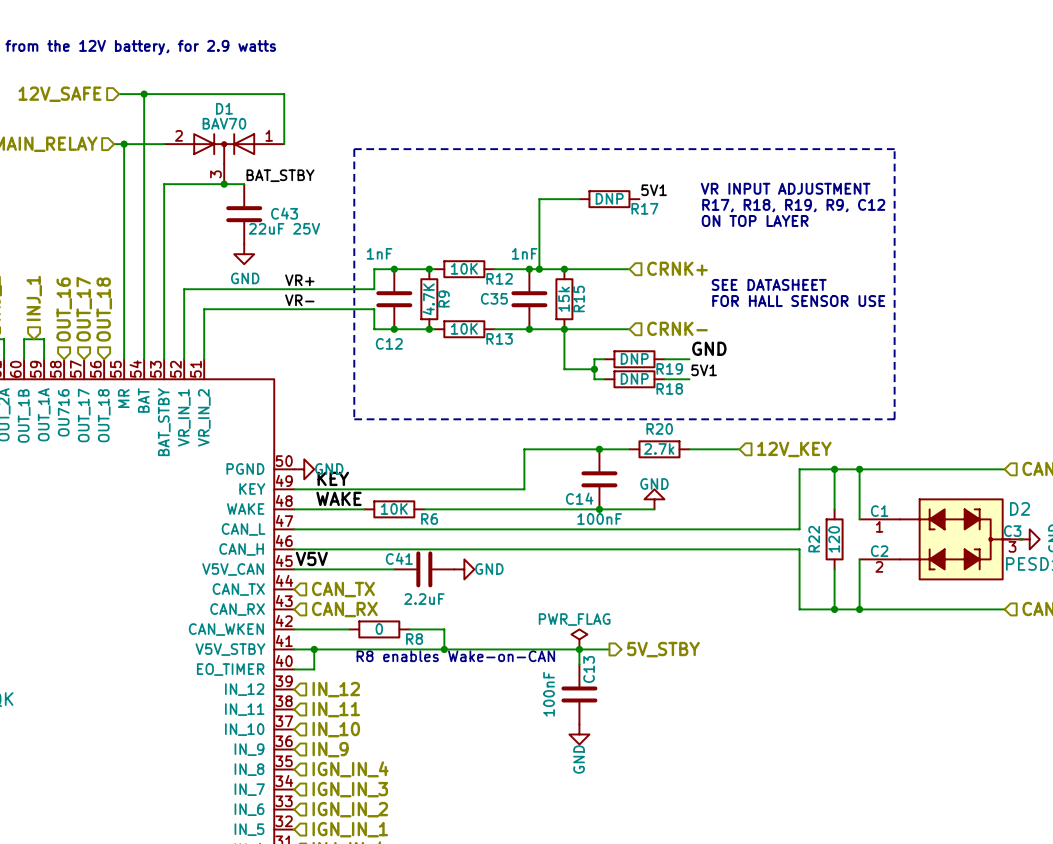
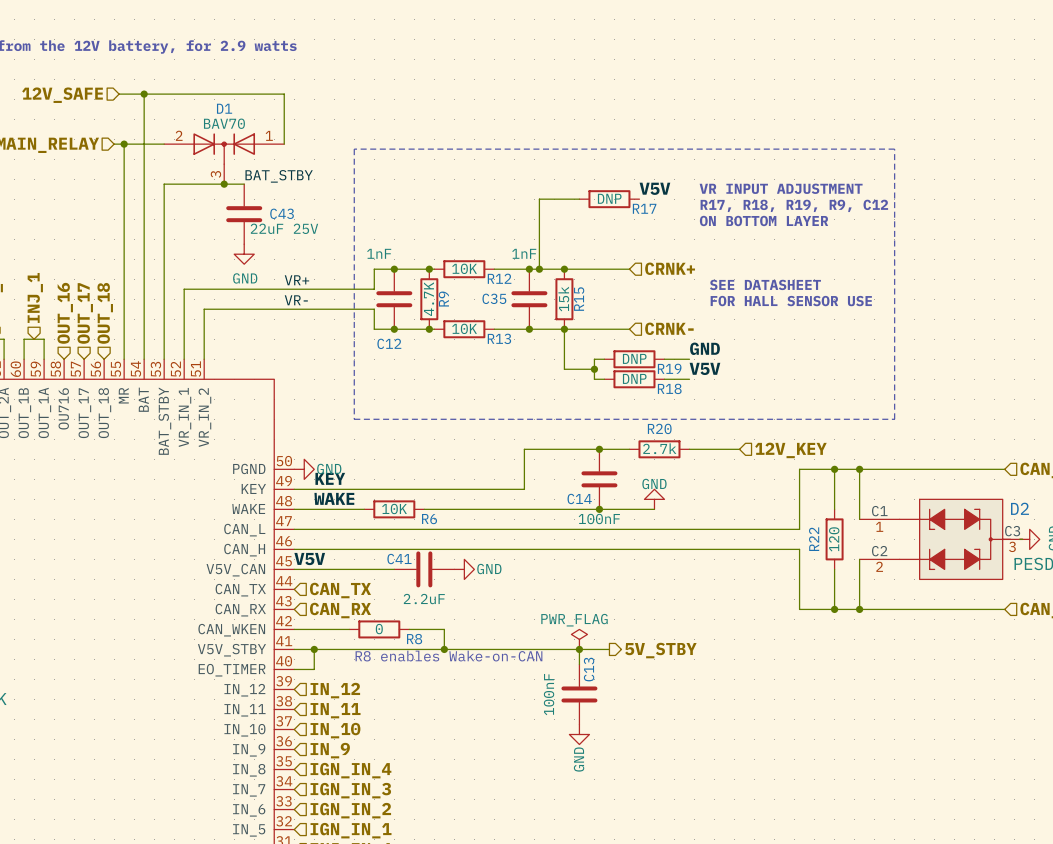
label: 5V1 (654, 190) -> V5V (654, 188)
text: ON TOP LAYER (755, 220) -> ON BOTTOM LAYER (764, 220)
label: 5V1 (704, 370) -> V5V (704, 368)

